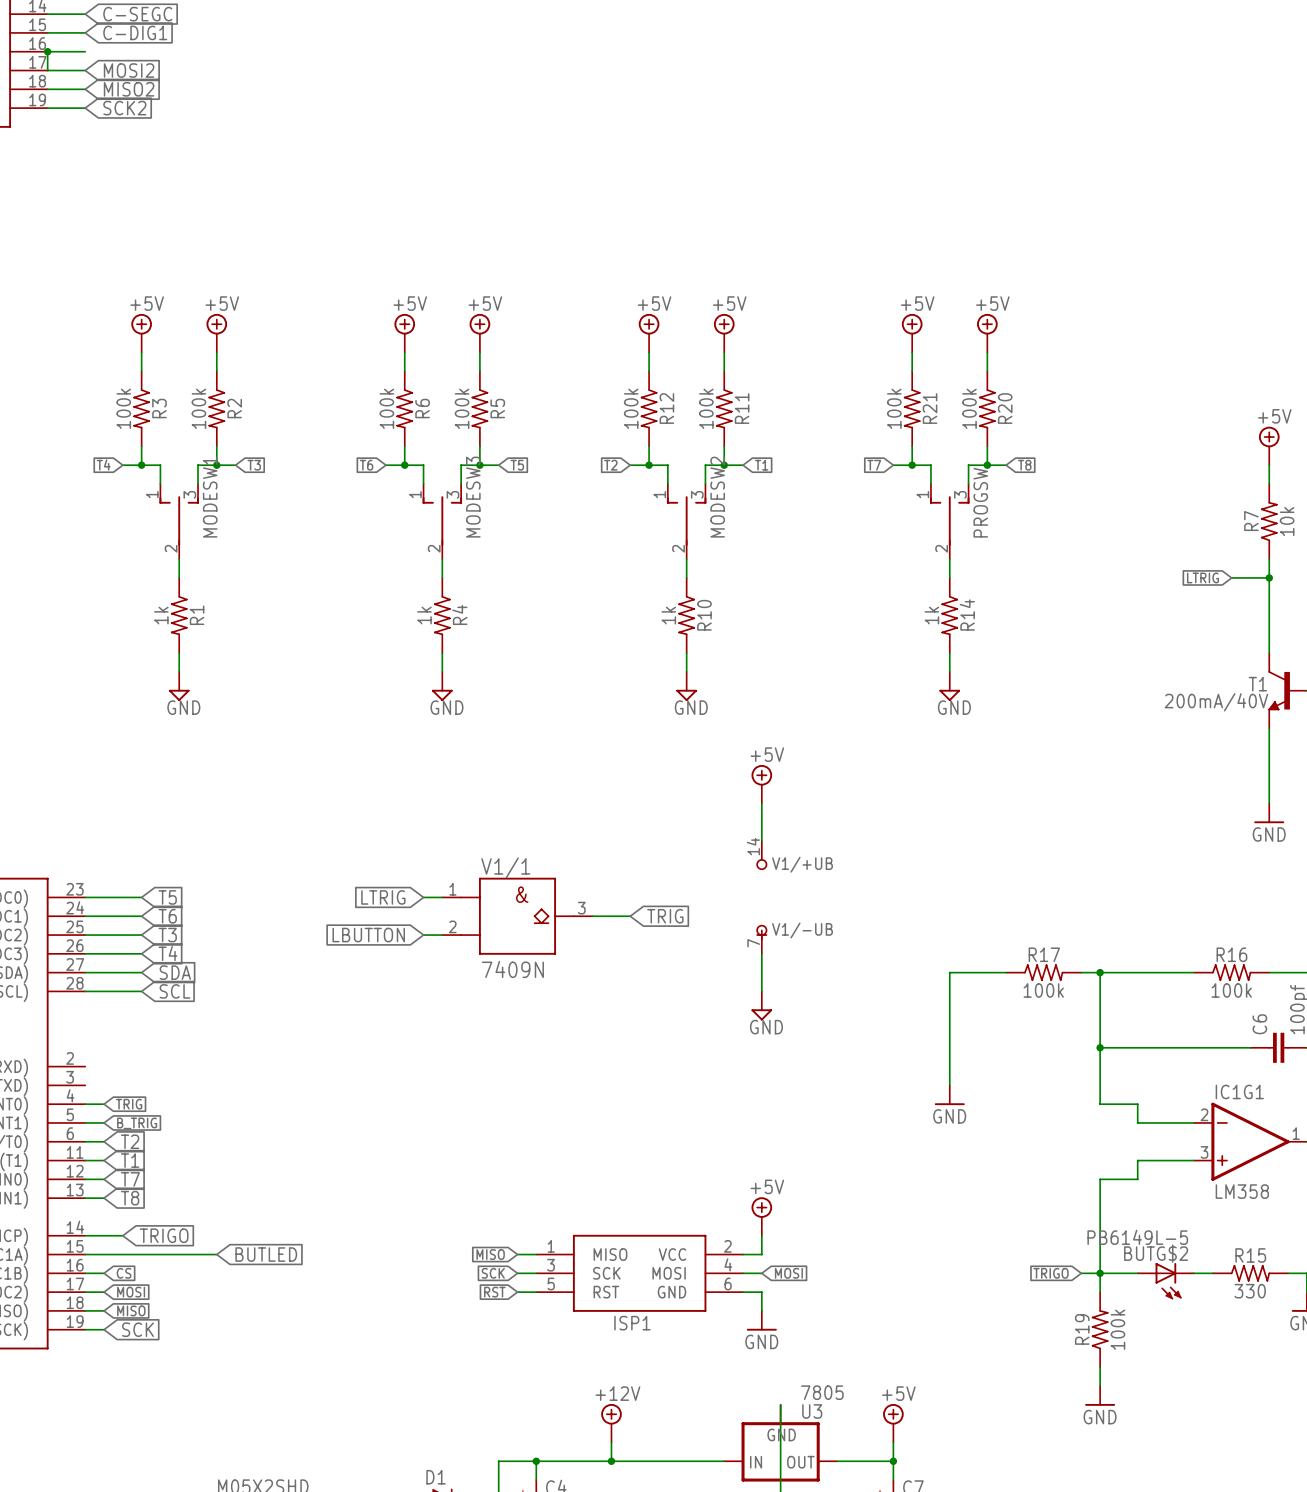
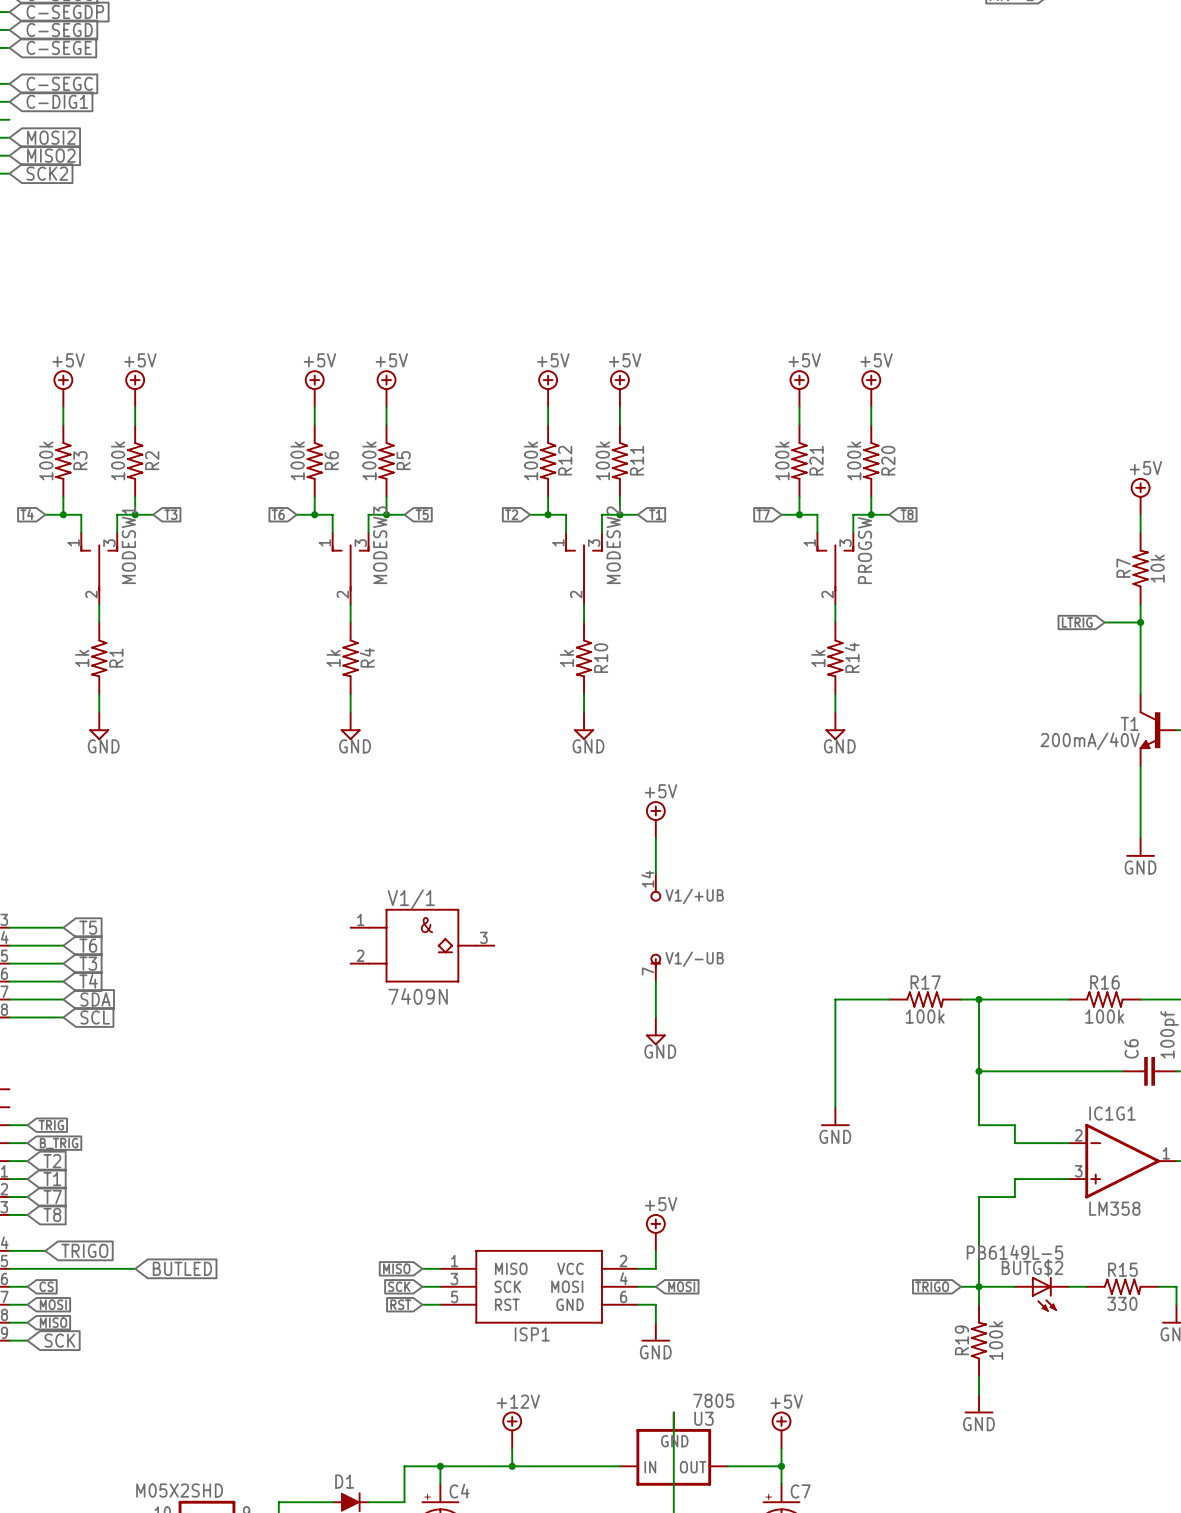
global label: LTRIG (383, 897) -> none
wire: (423, 897) (442, 897) -> none
wire: (592, 916) (630, 916) -> none
global label: TRIG (665, 916) -> none
global label: LBUTTON (368, 935) -> none
wire: (423, 935) (442, 935) -> none

